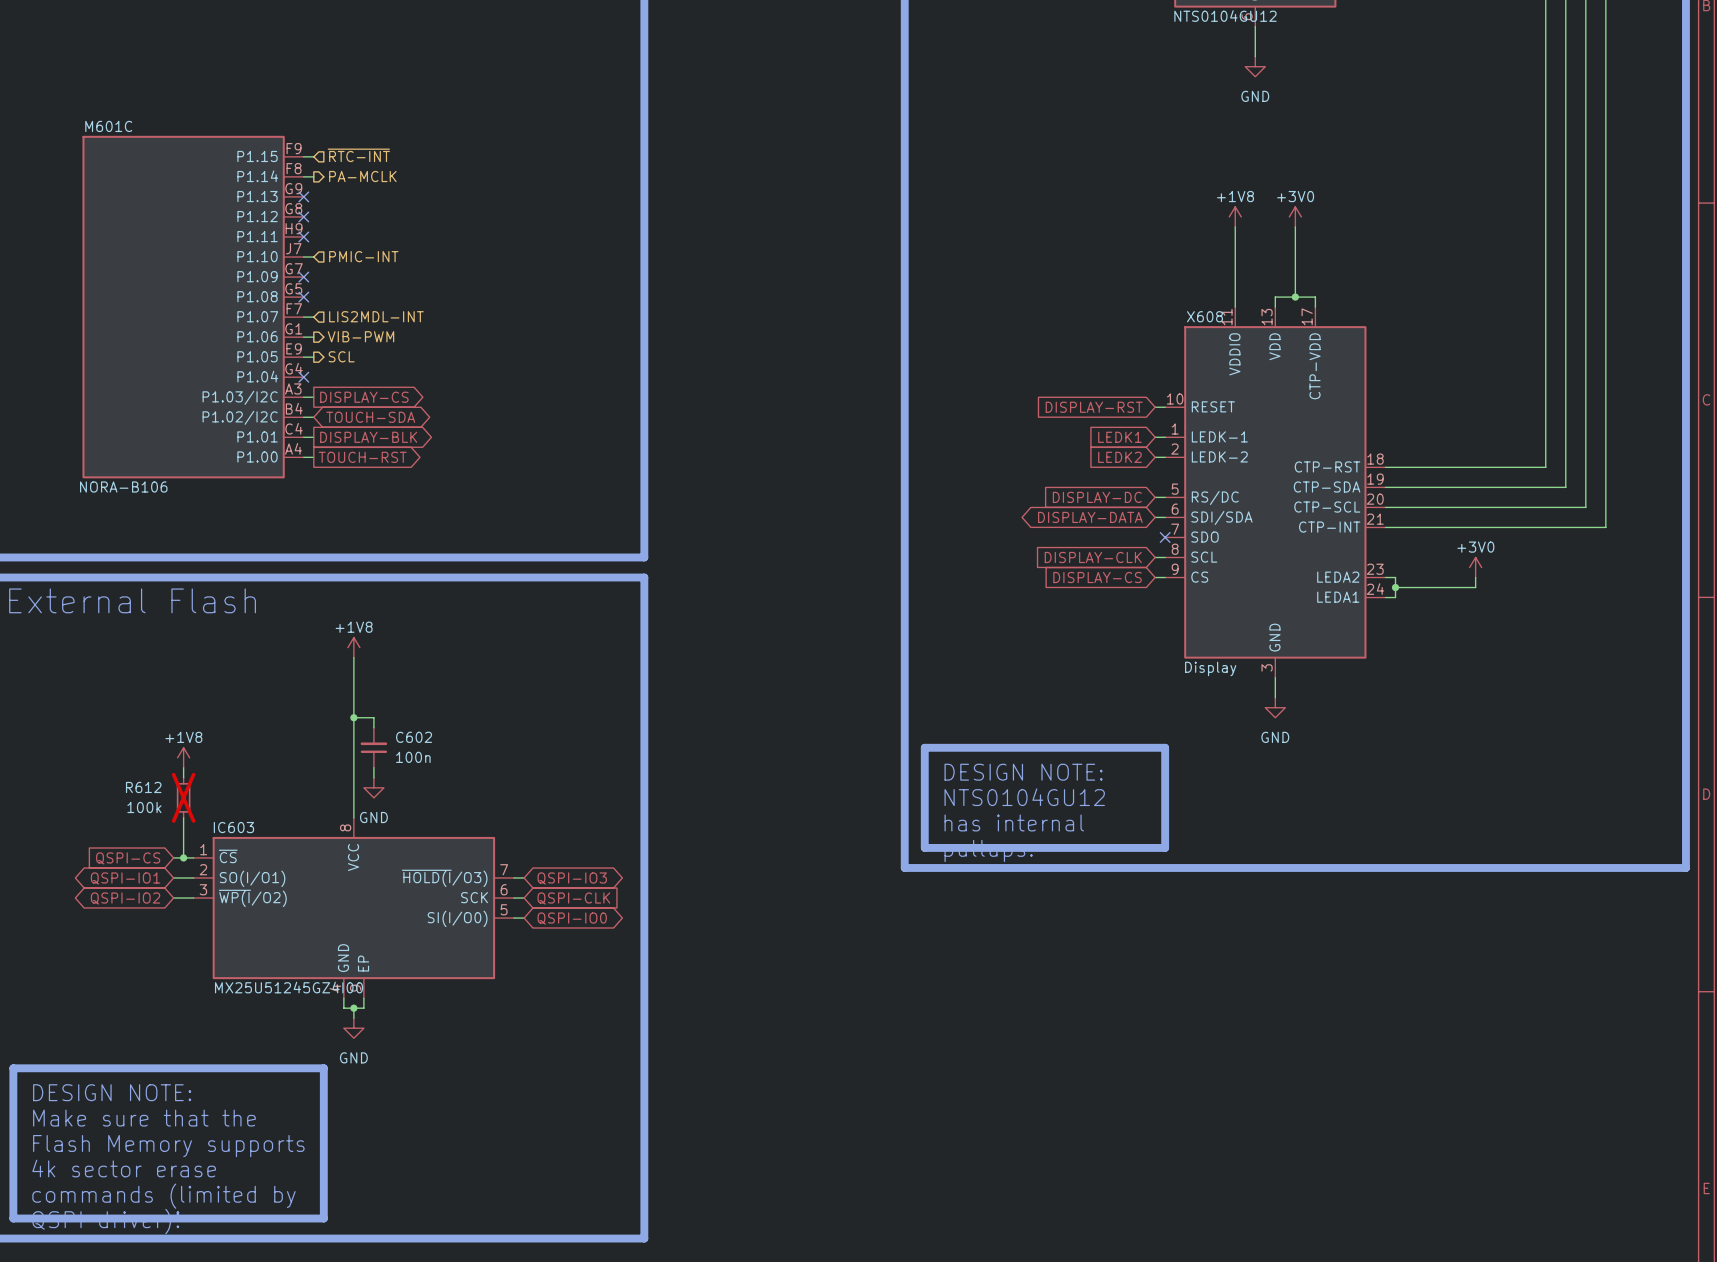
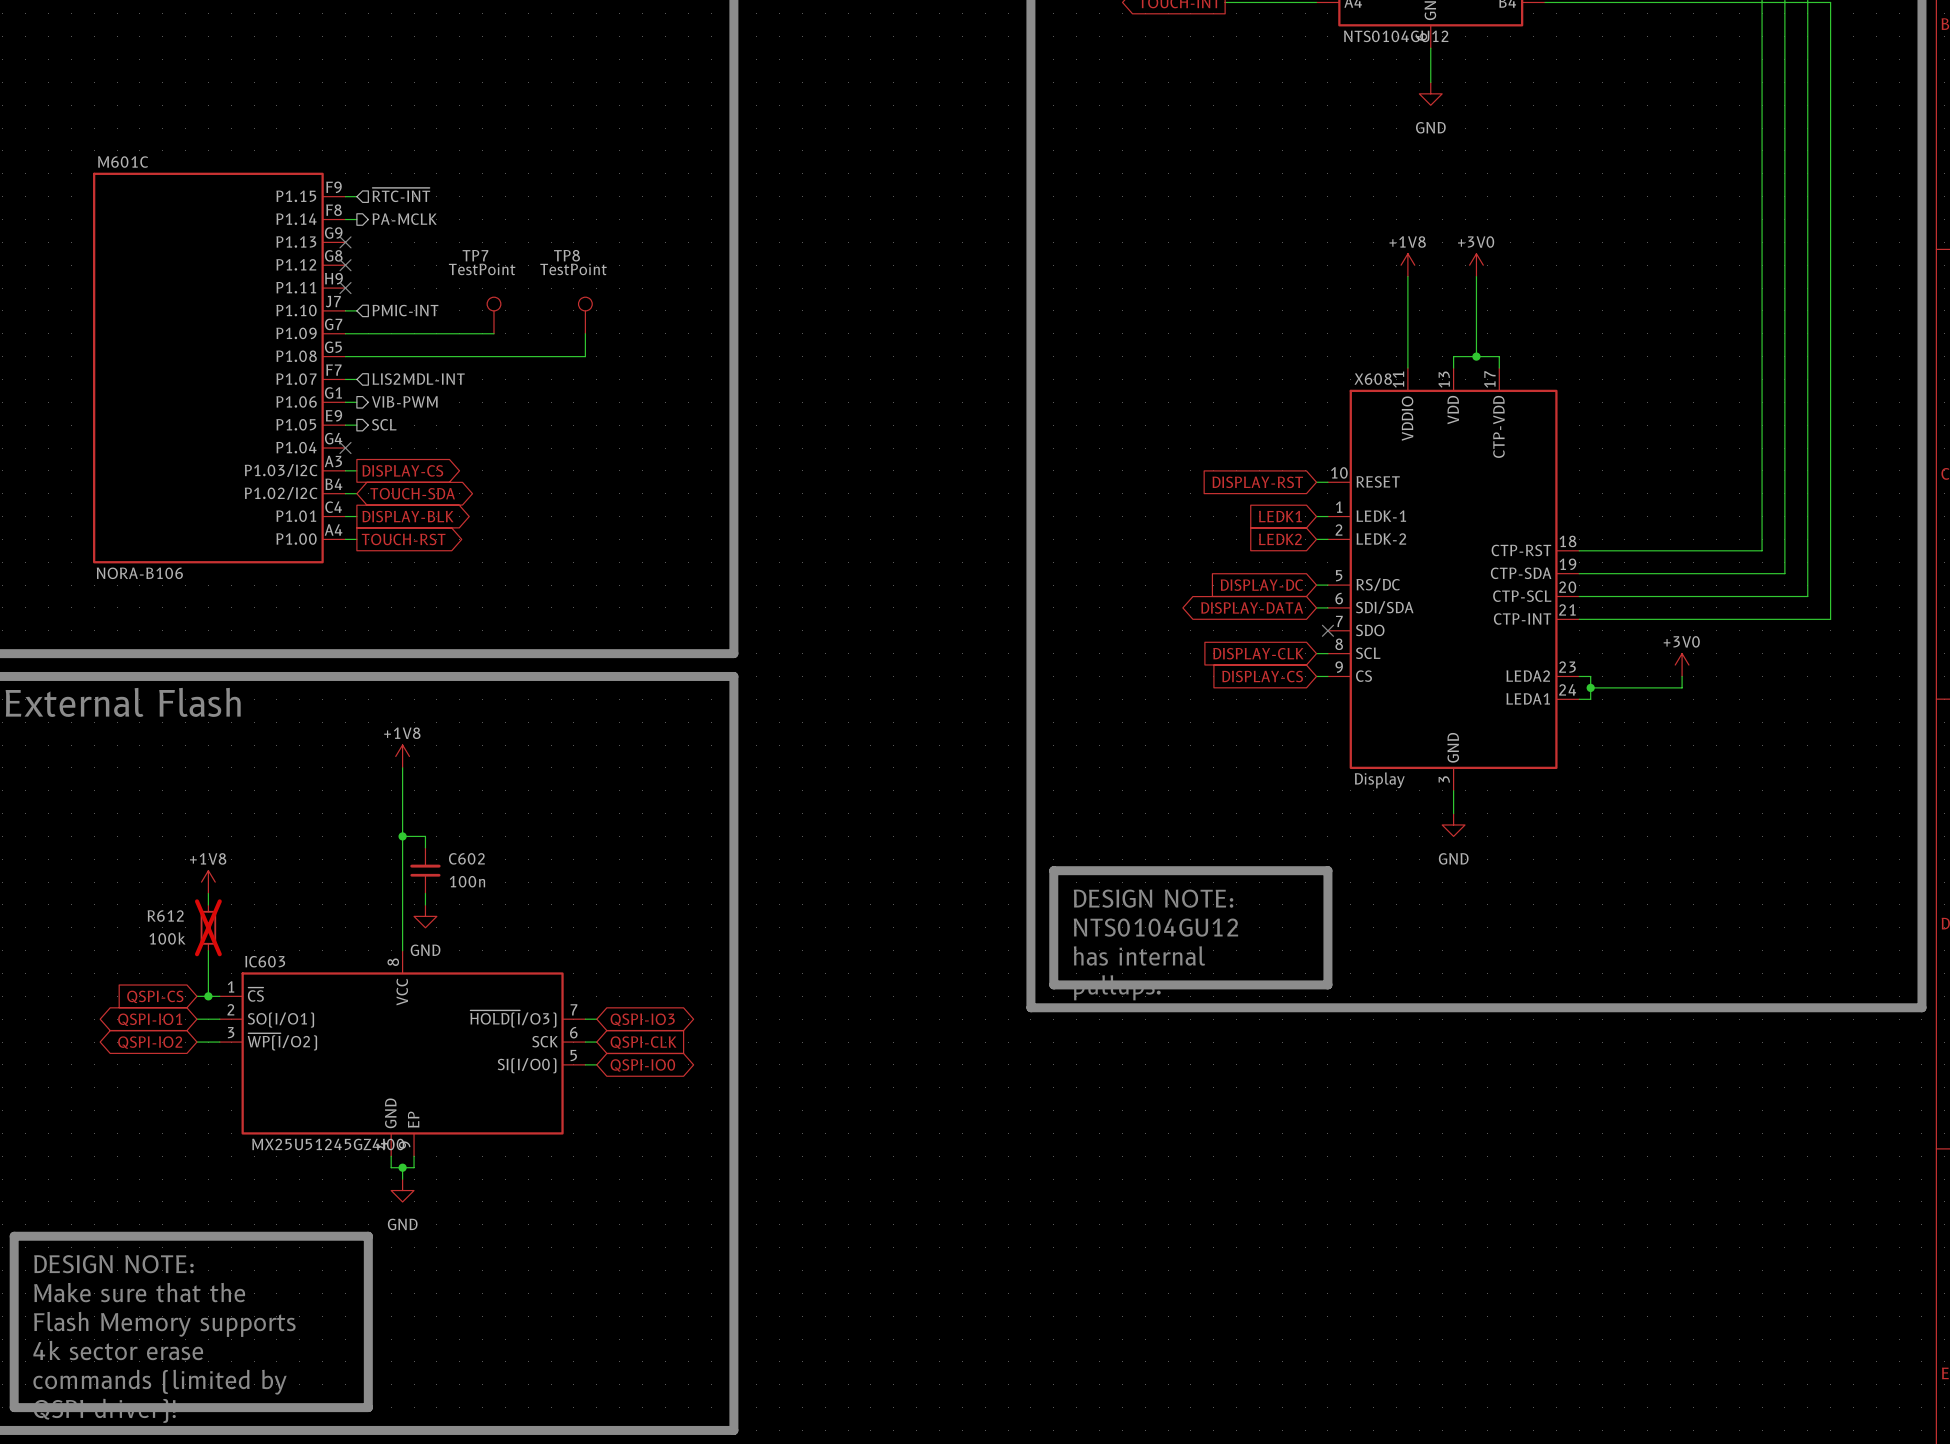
TP7: none -> TestPoint (493, 315)
TP8: none -> TestPoint (585, 315)
wire: none -> (345, 333) (493, 333)
no-connect mark: (303, 277) -> none
wire: none -> (585, 333) (585, 356) (345, 356)
no-connect mark: (303, 297) -> none

